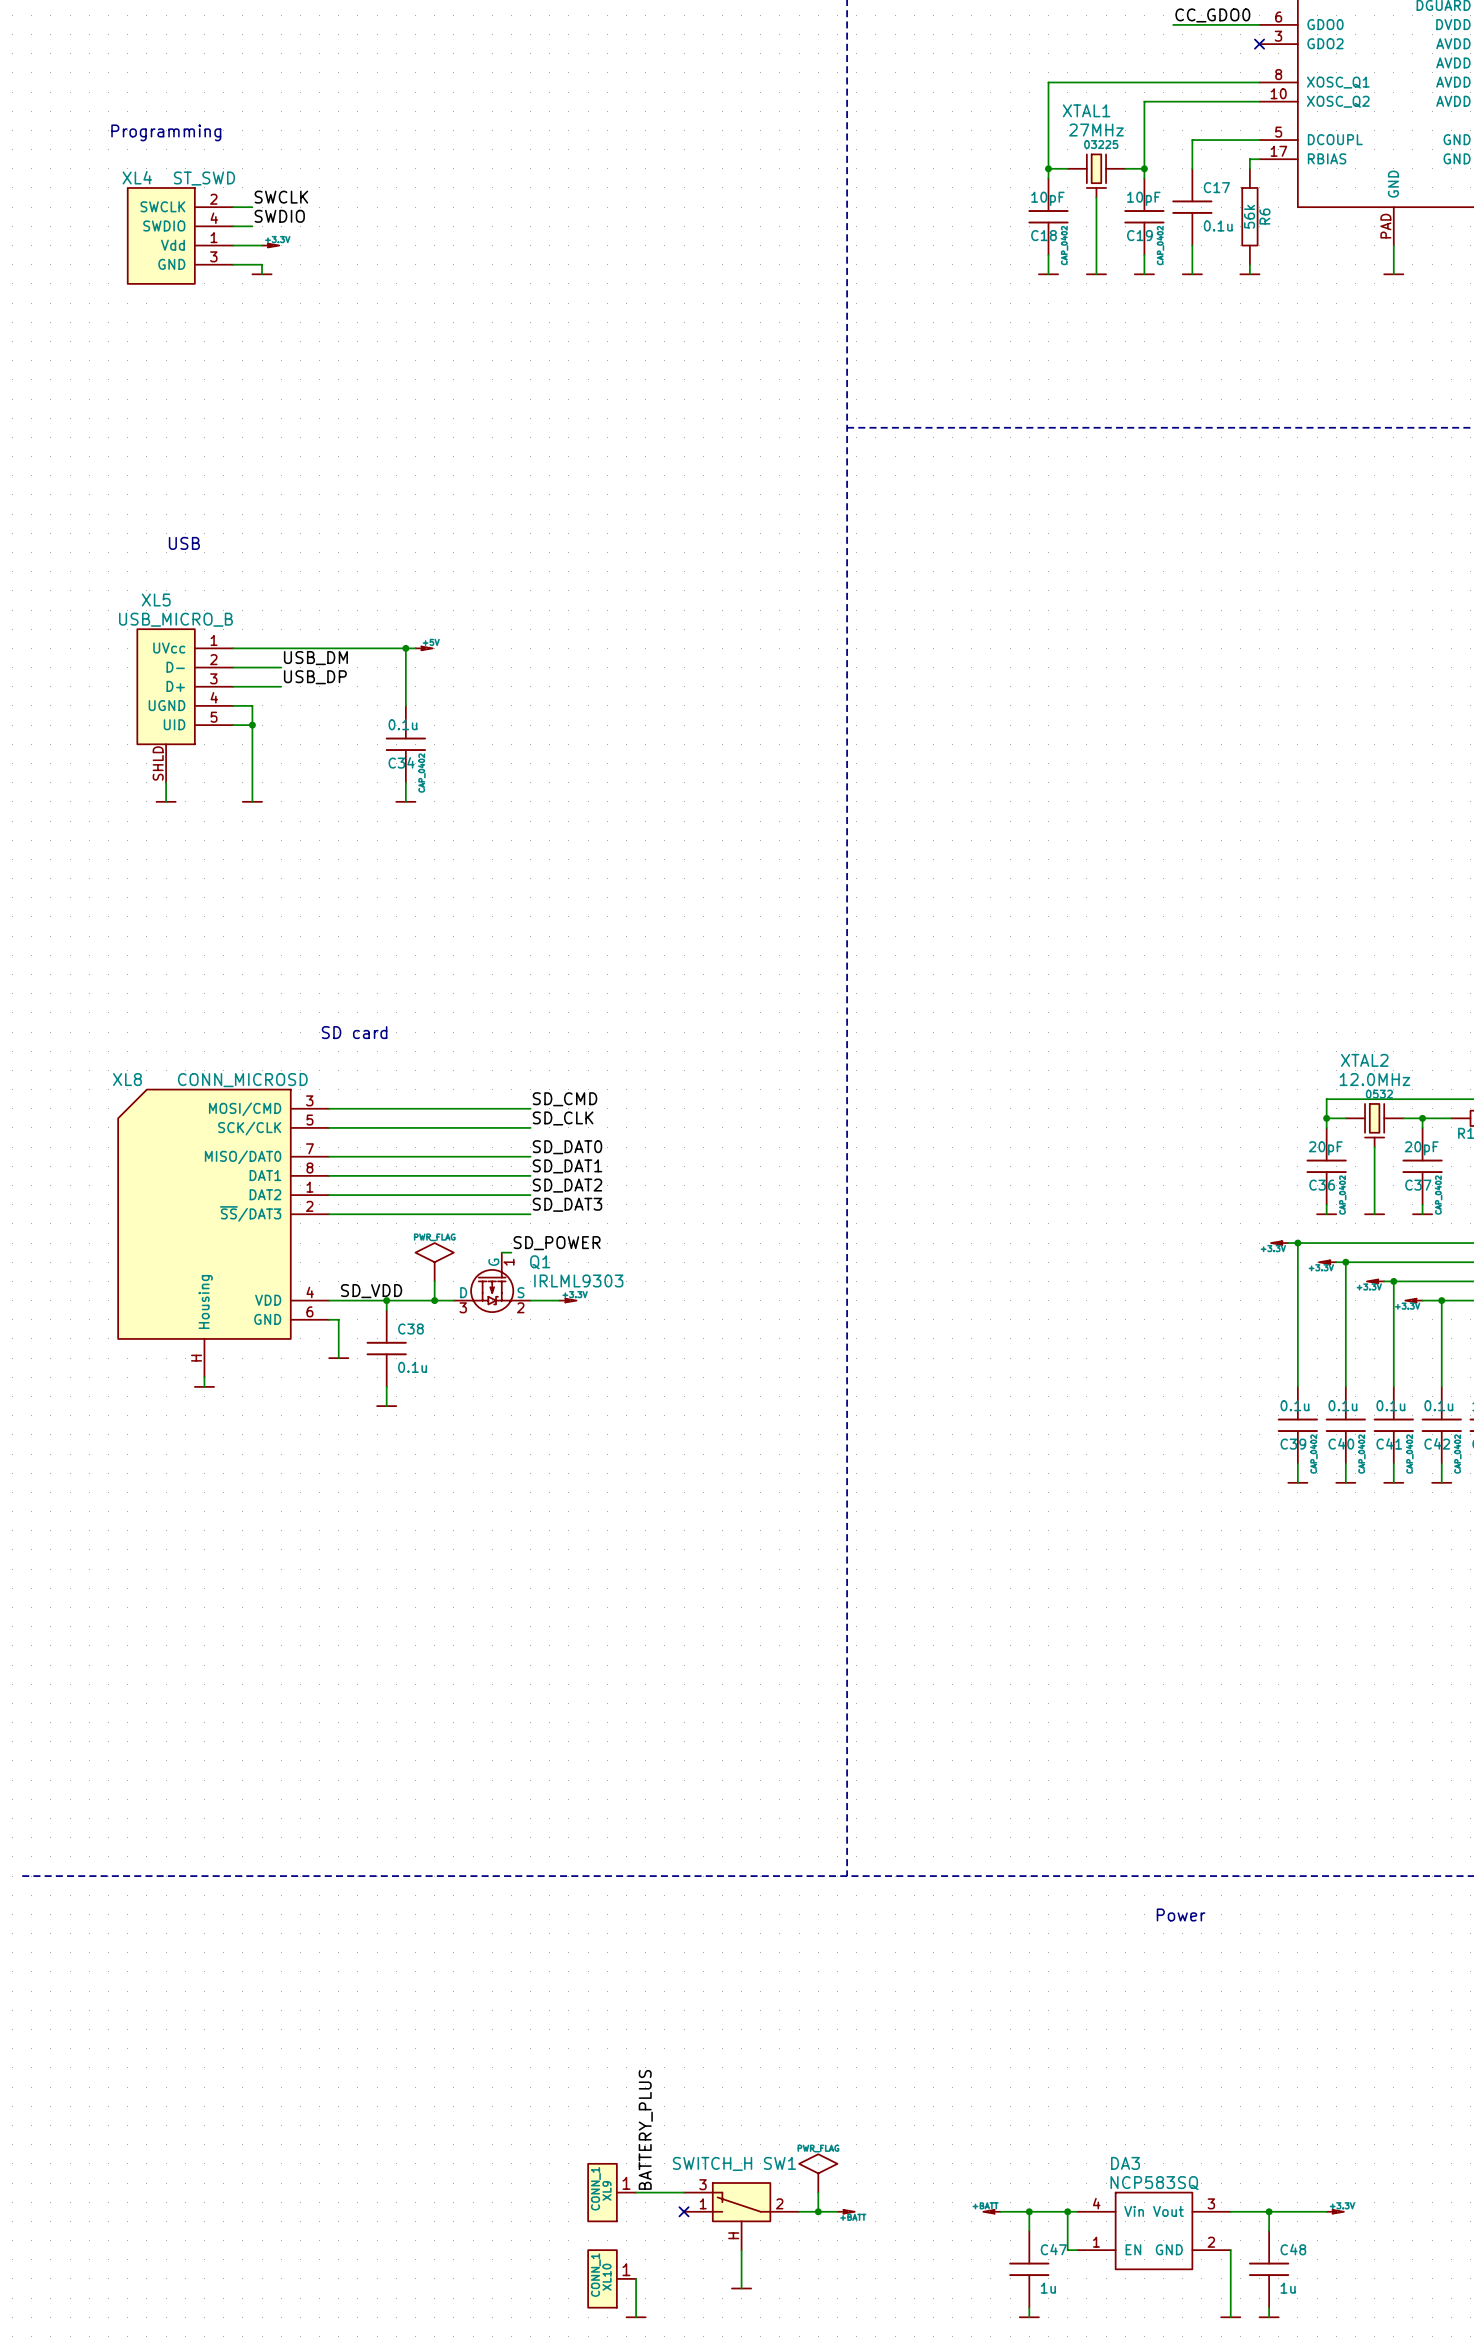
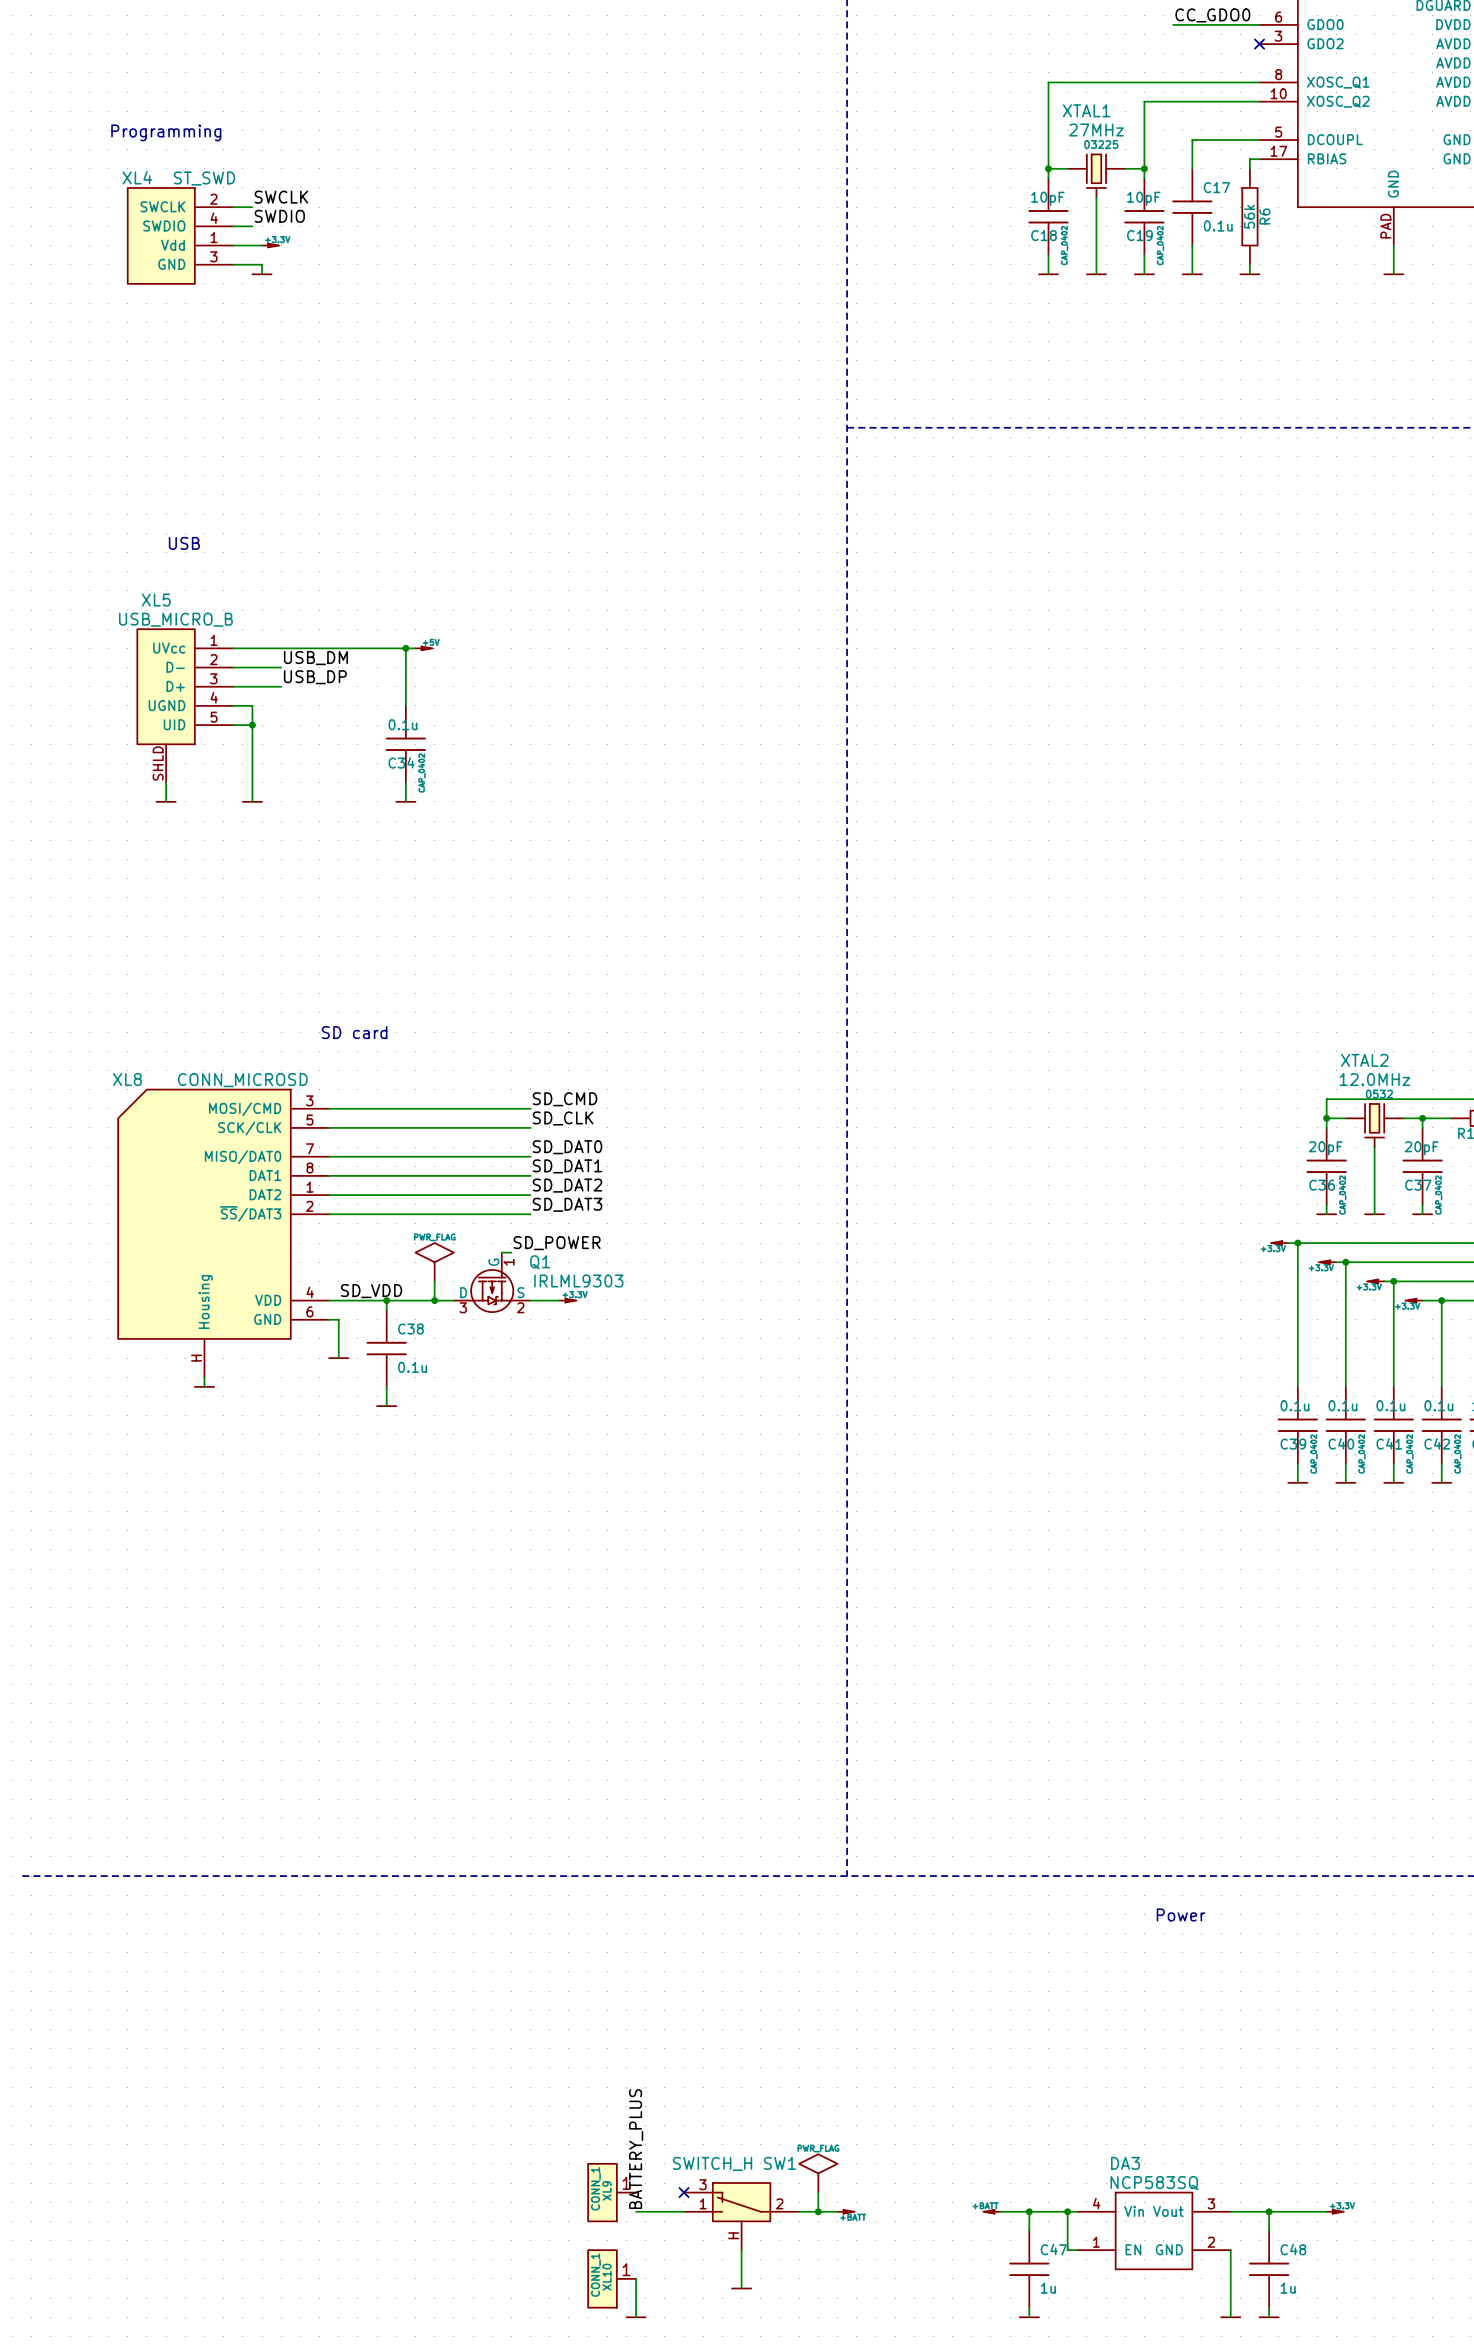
label position: BATTERY_PLUS (645, 2129) -> BATTERY_PLUS (636, 2149)
wire: (636, 2192) (684, 2192) -> (636, 2211) (684, 2211)
no-connect mark position: (684, 2211) -> (684, 2192)

